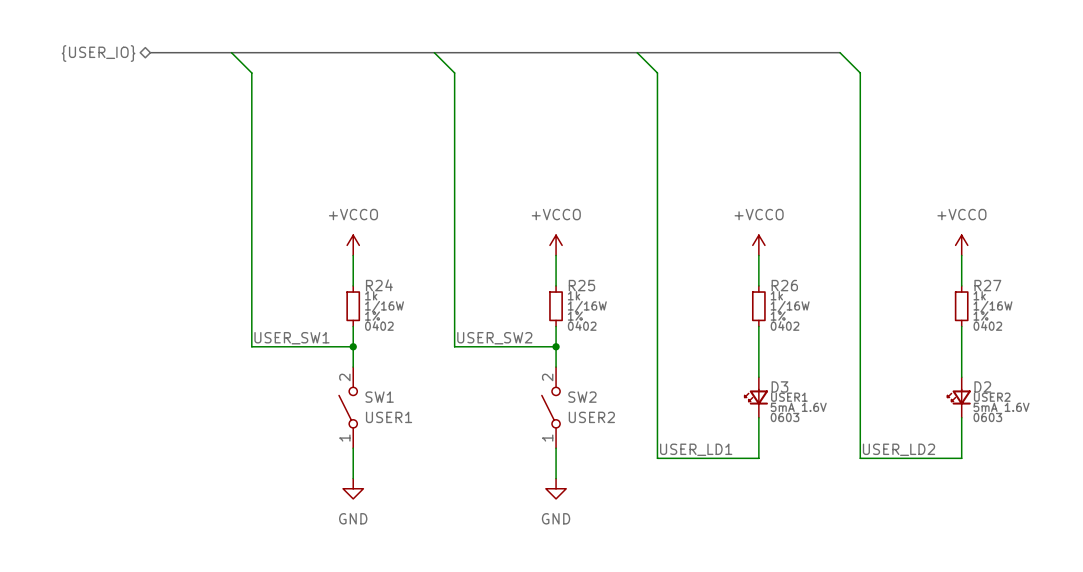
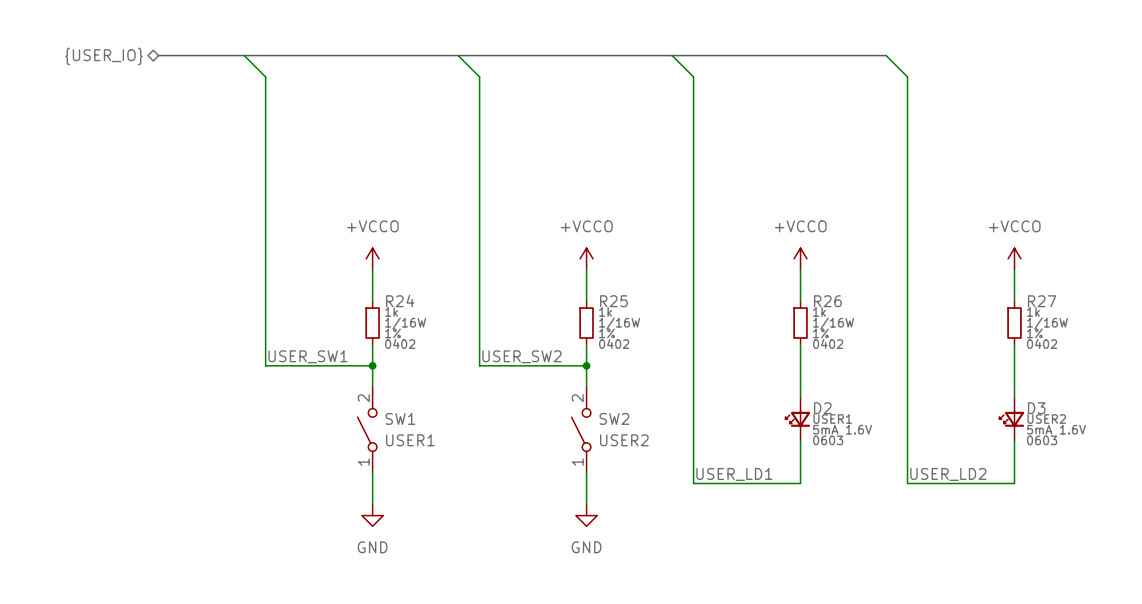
D3 name: D3 (779, 386) -> D2 (822, 408)
D2 name: D2 (982, 386) -> D3 (1036, 408)

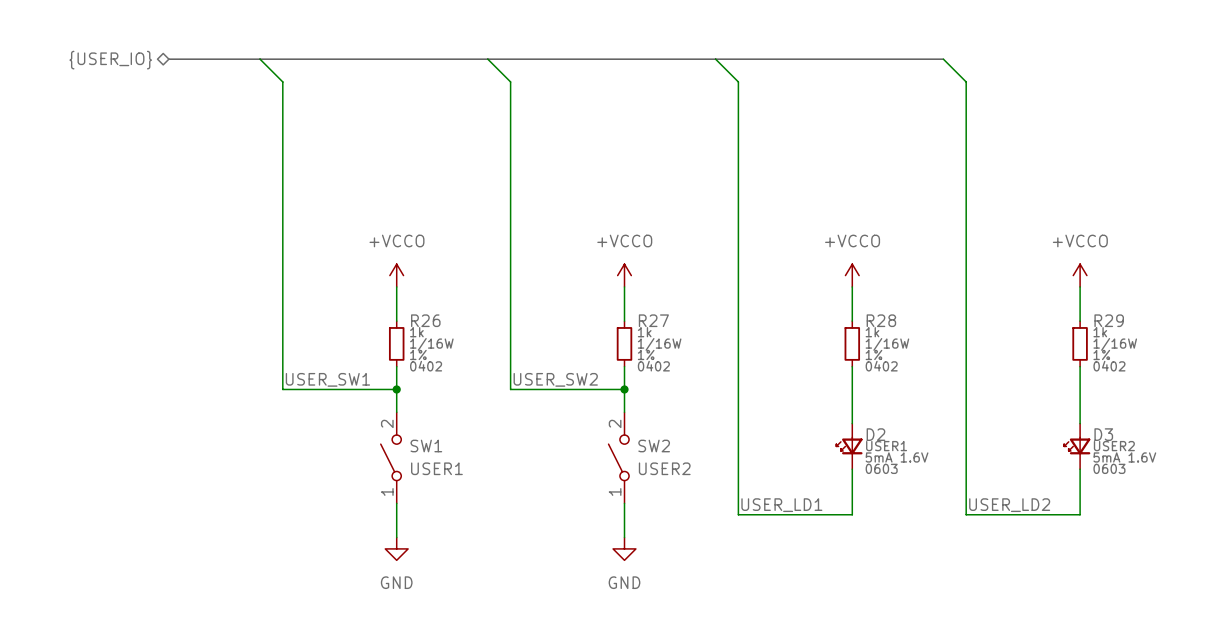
R24 name: R24 (400, 300) -> R26 (425, 320)
R25 name: R25 (613, 301) -> R27 (653, 320)
R26 name: R26 (827, 301) -> R28 (881, 320)
R27 name: R27 (1042, 301) -> R29 (1109, 320)

